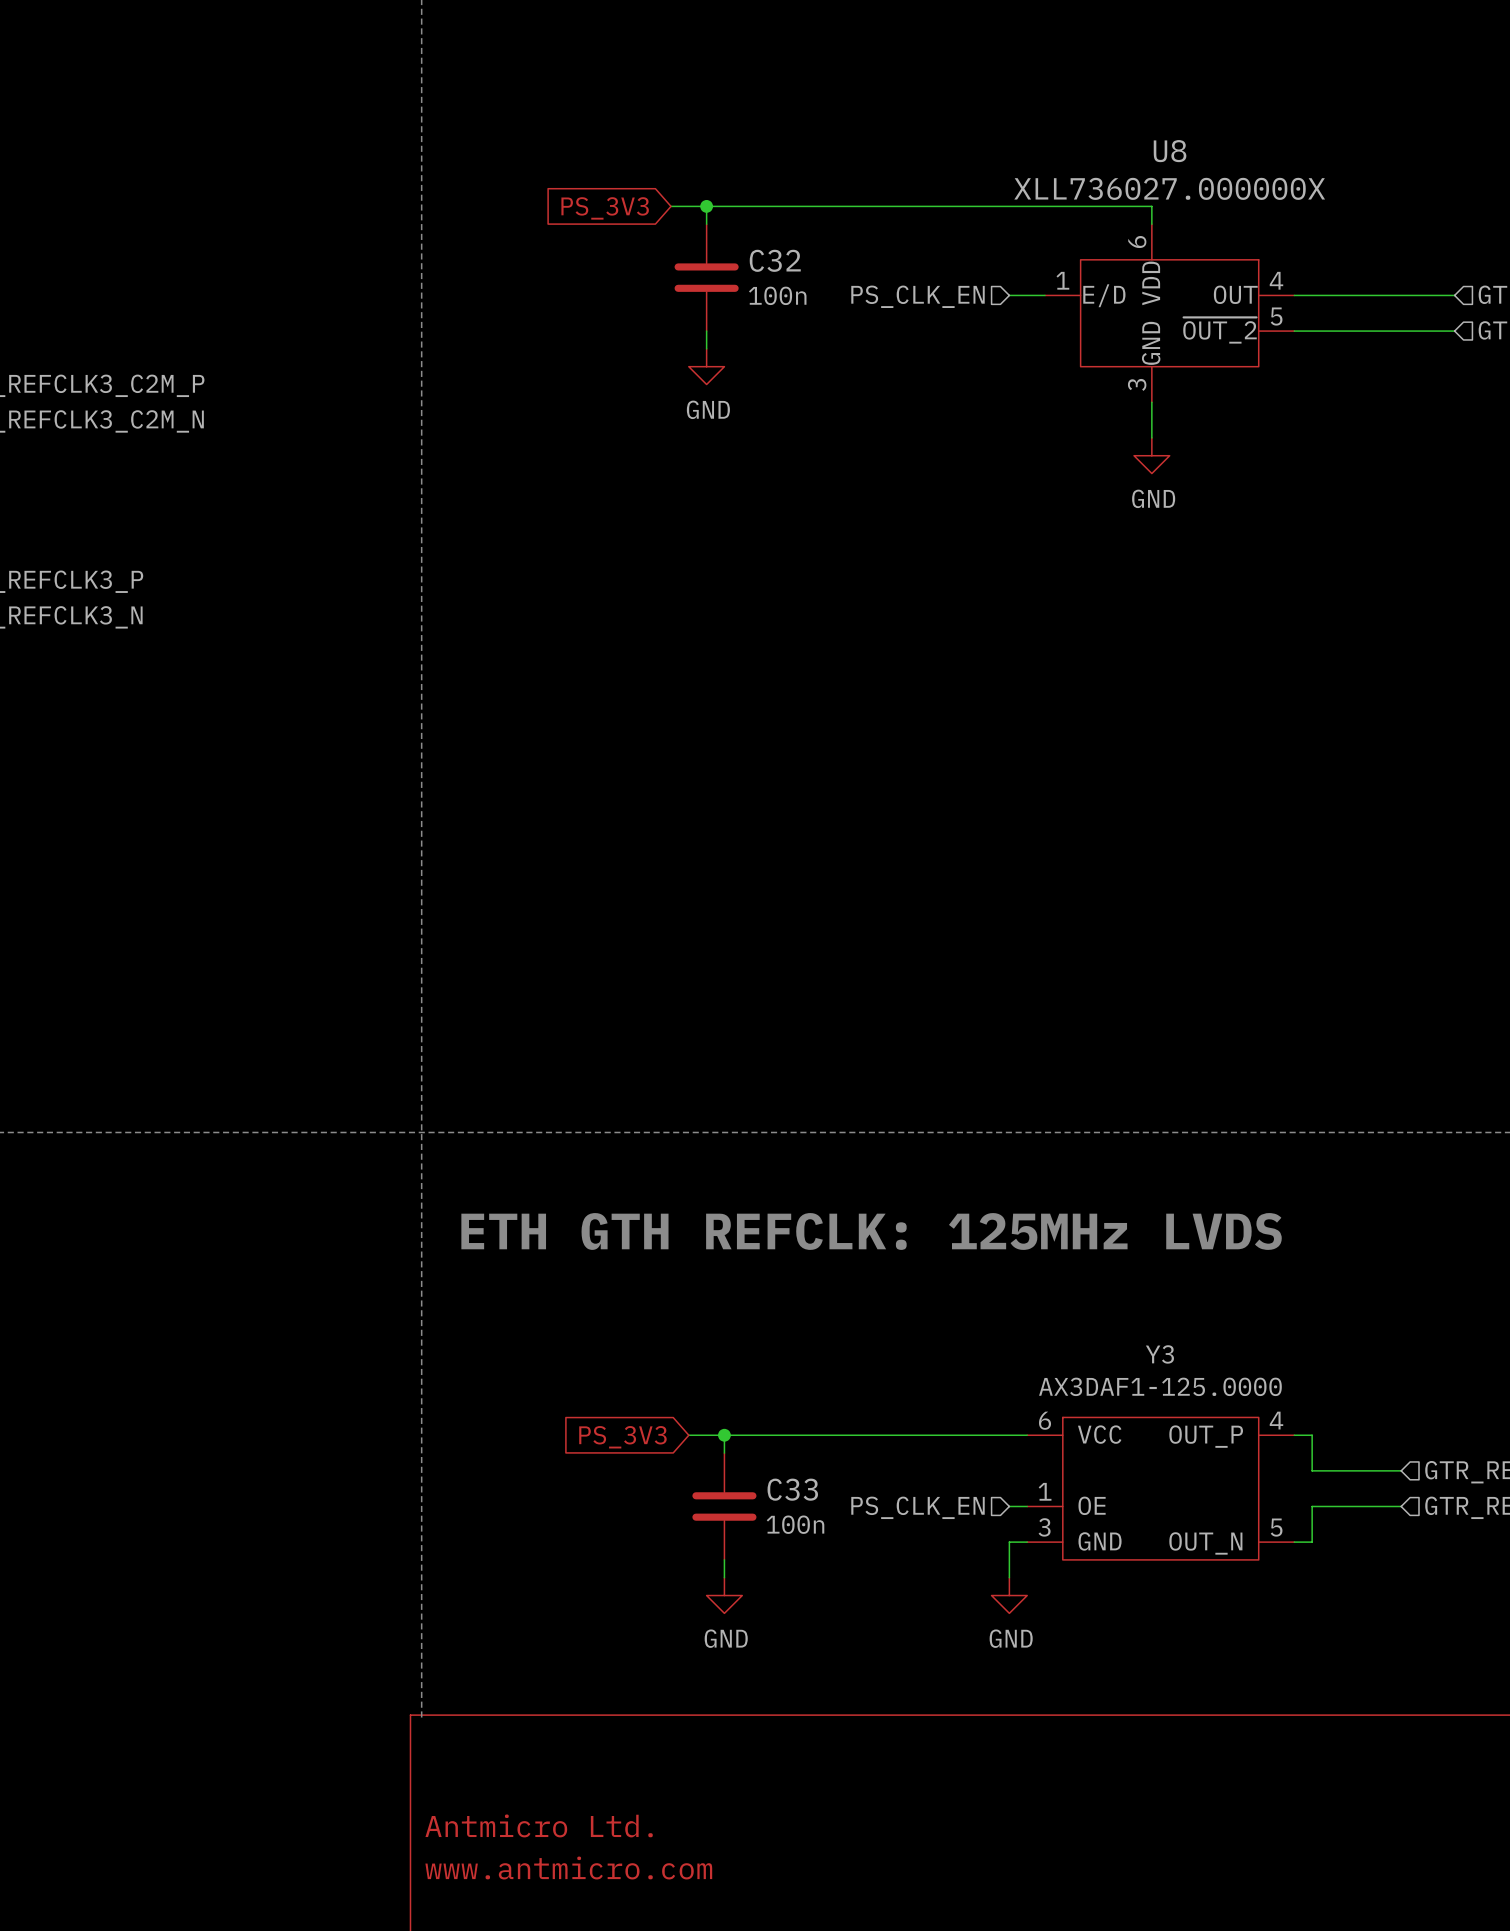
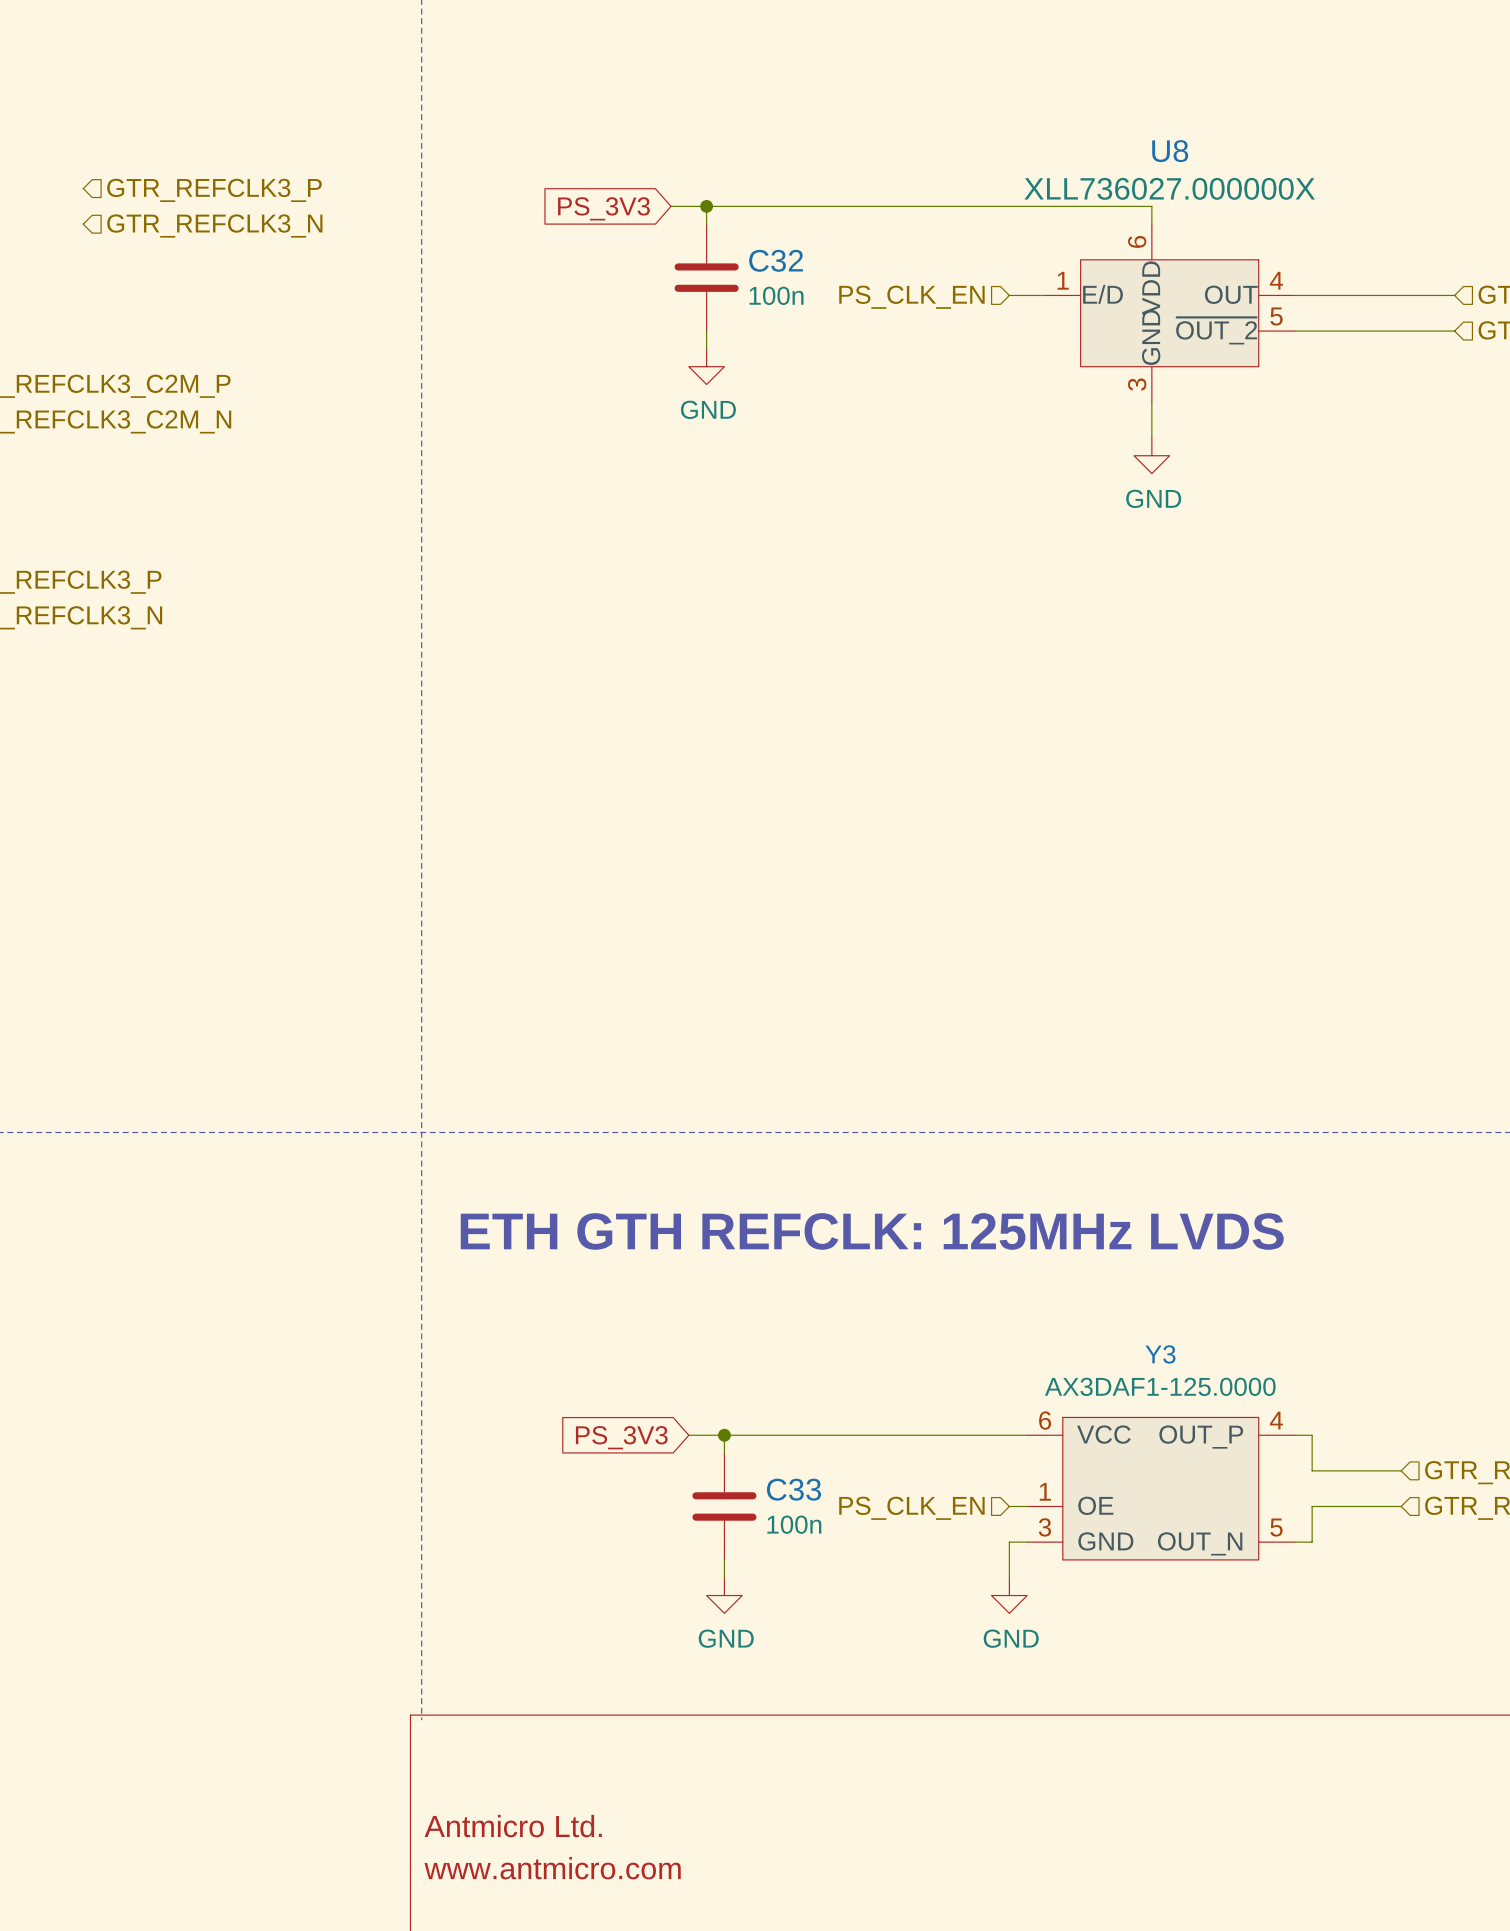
hierarchical label: none -> GTR_REFCLK3_P (214, 190)
hierarchical label: none -> GTR_REFCLK3_N (214, 225)

